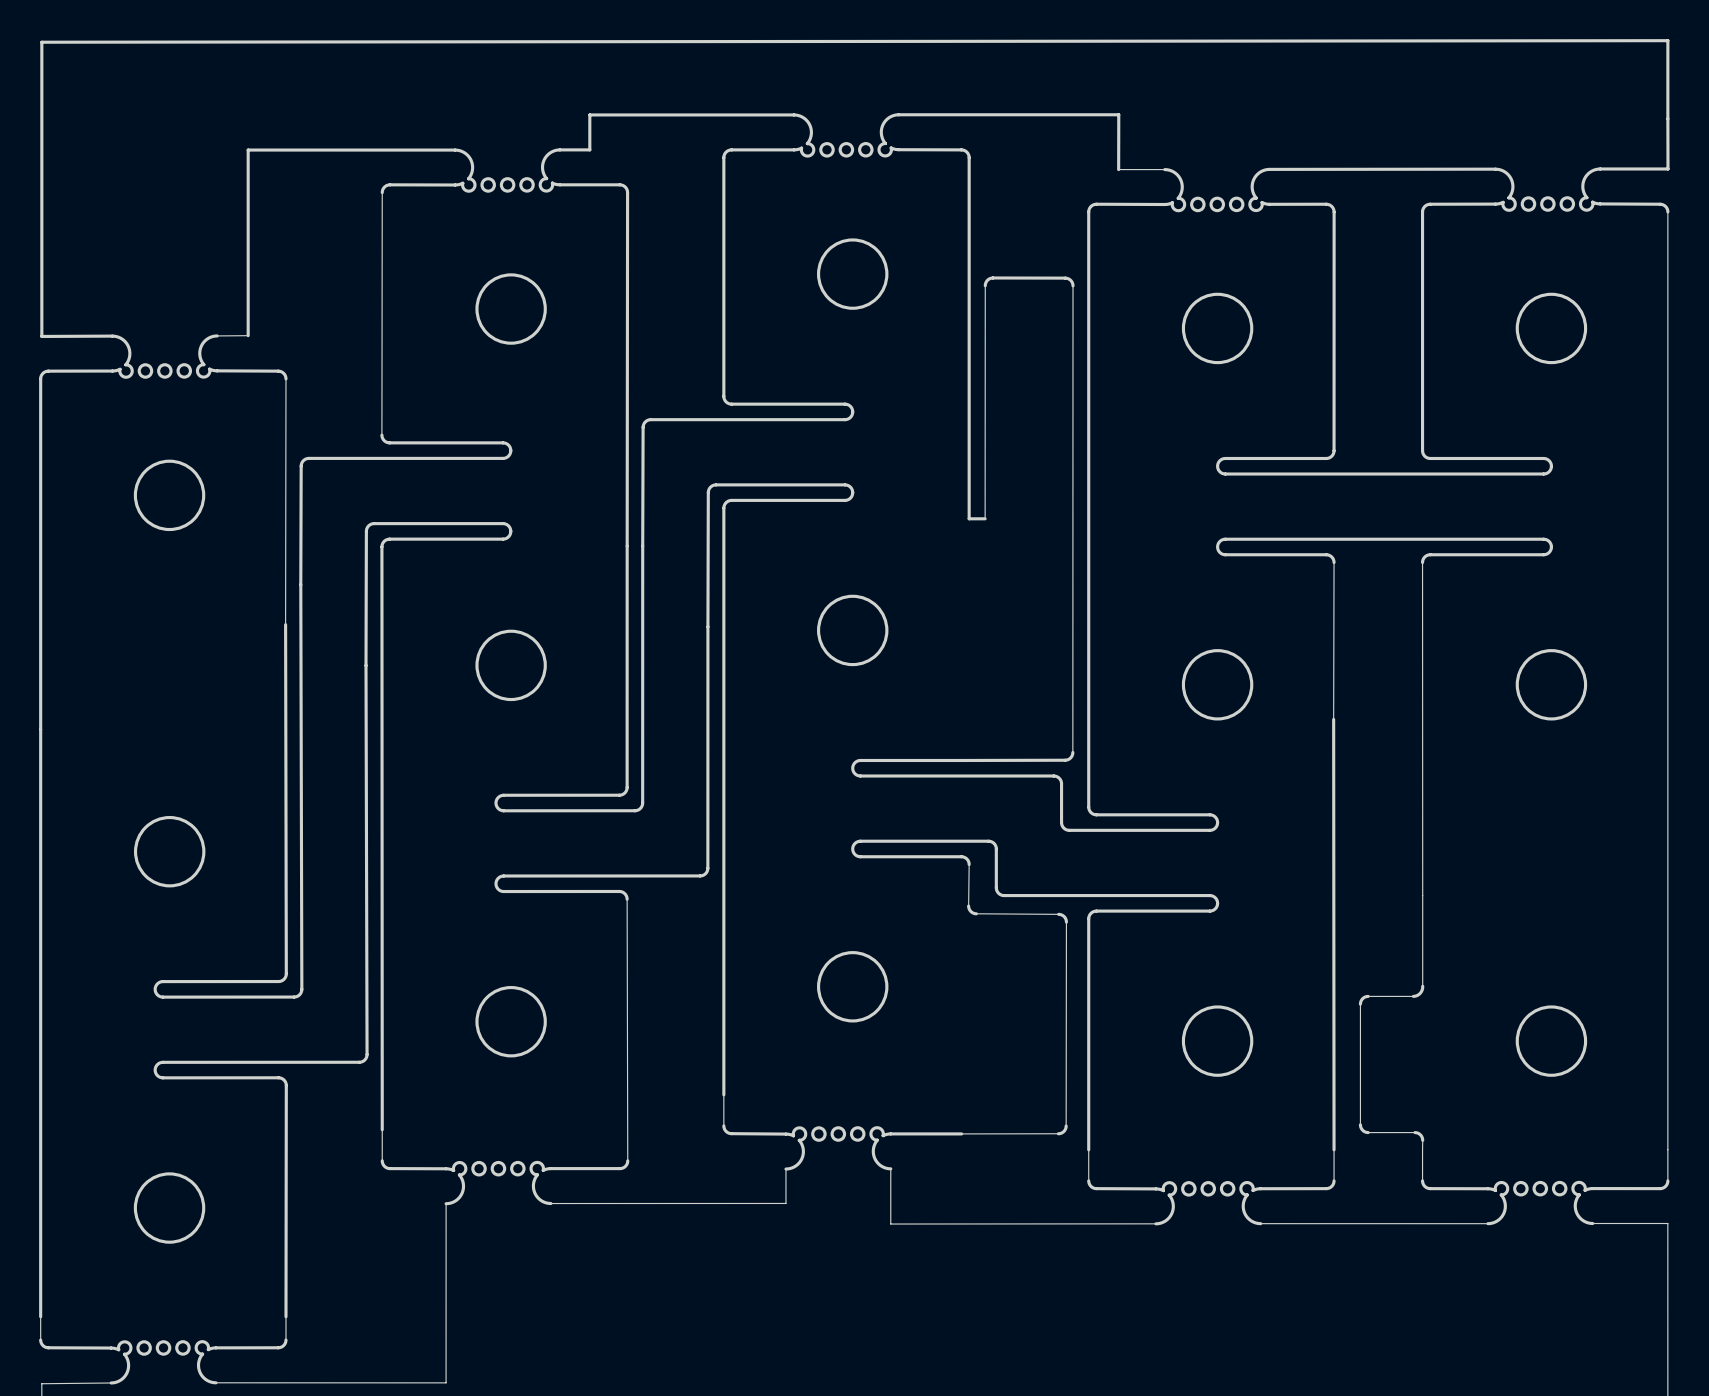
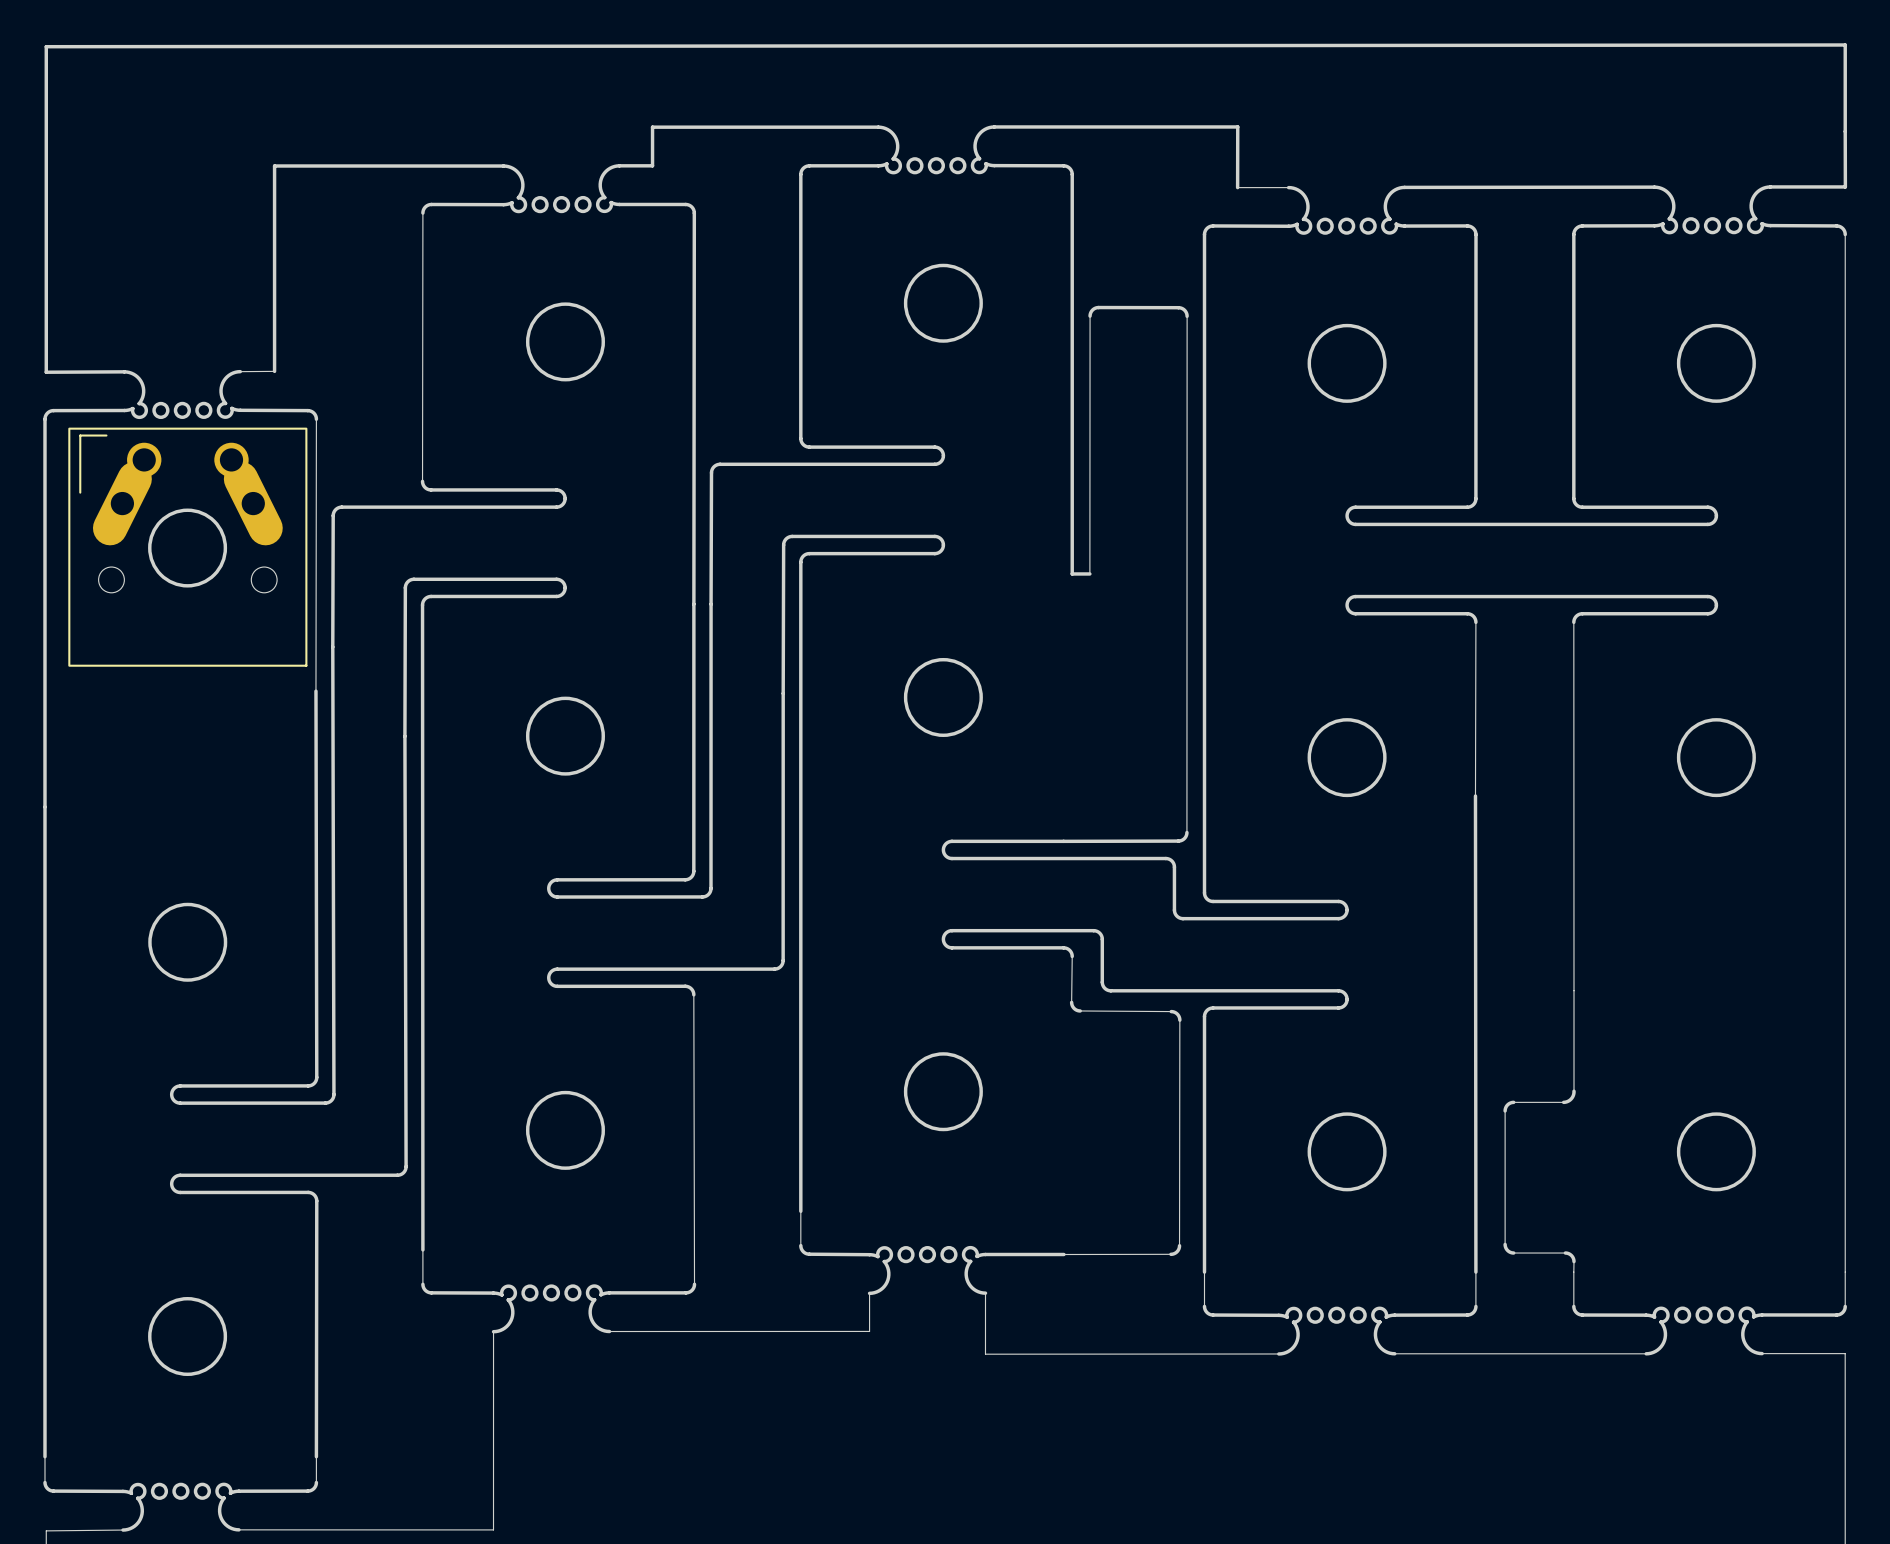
part: none -> (187, 547)

